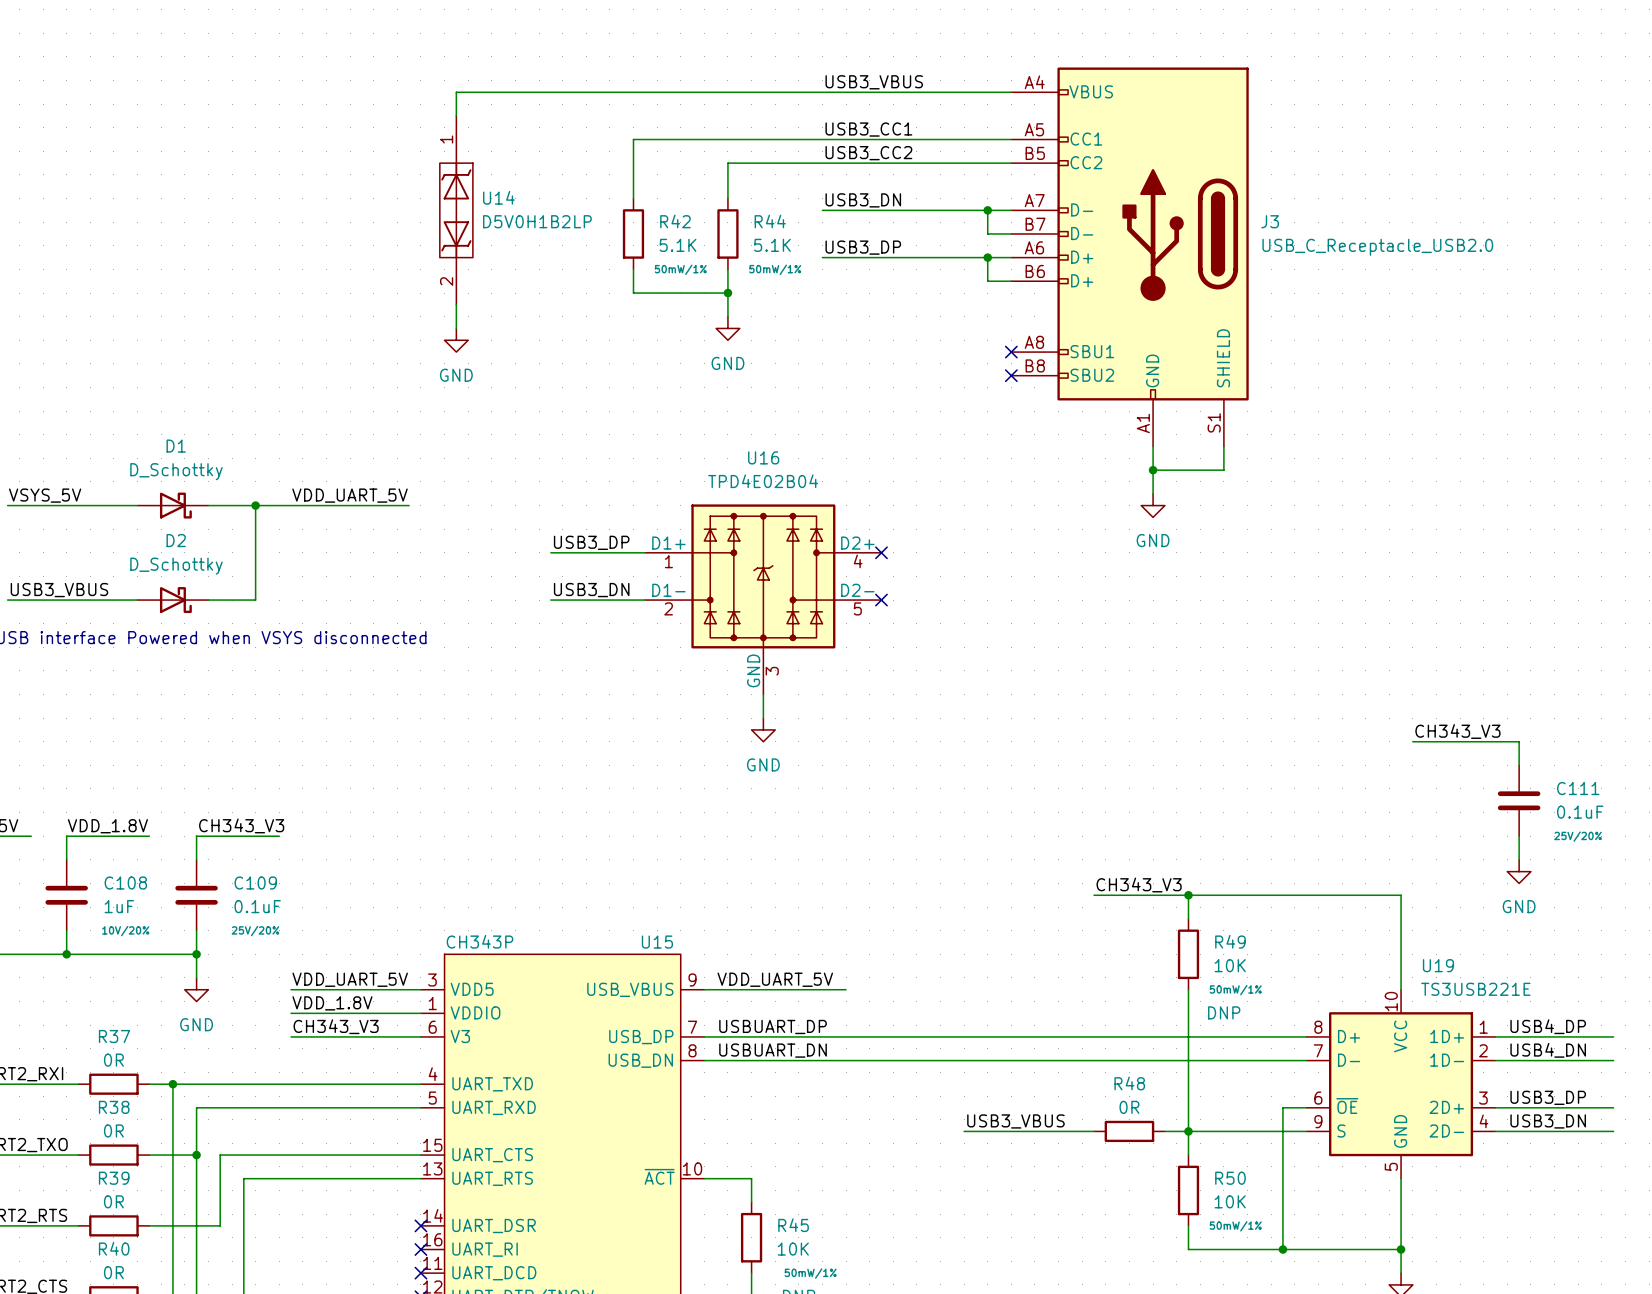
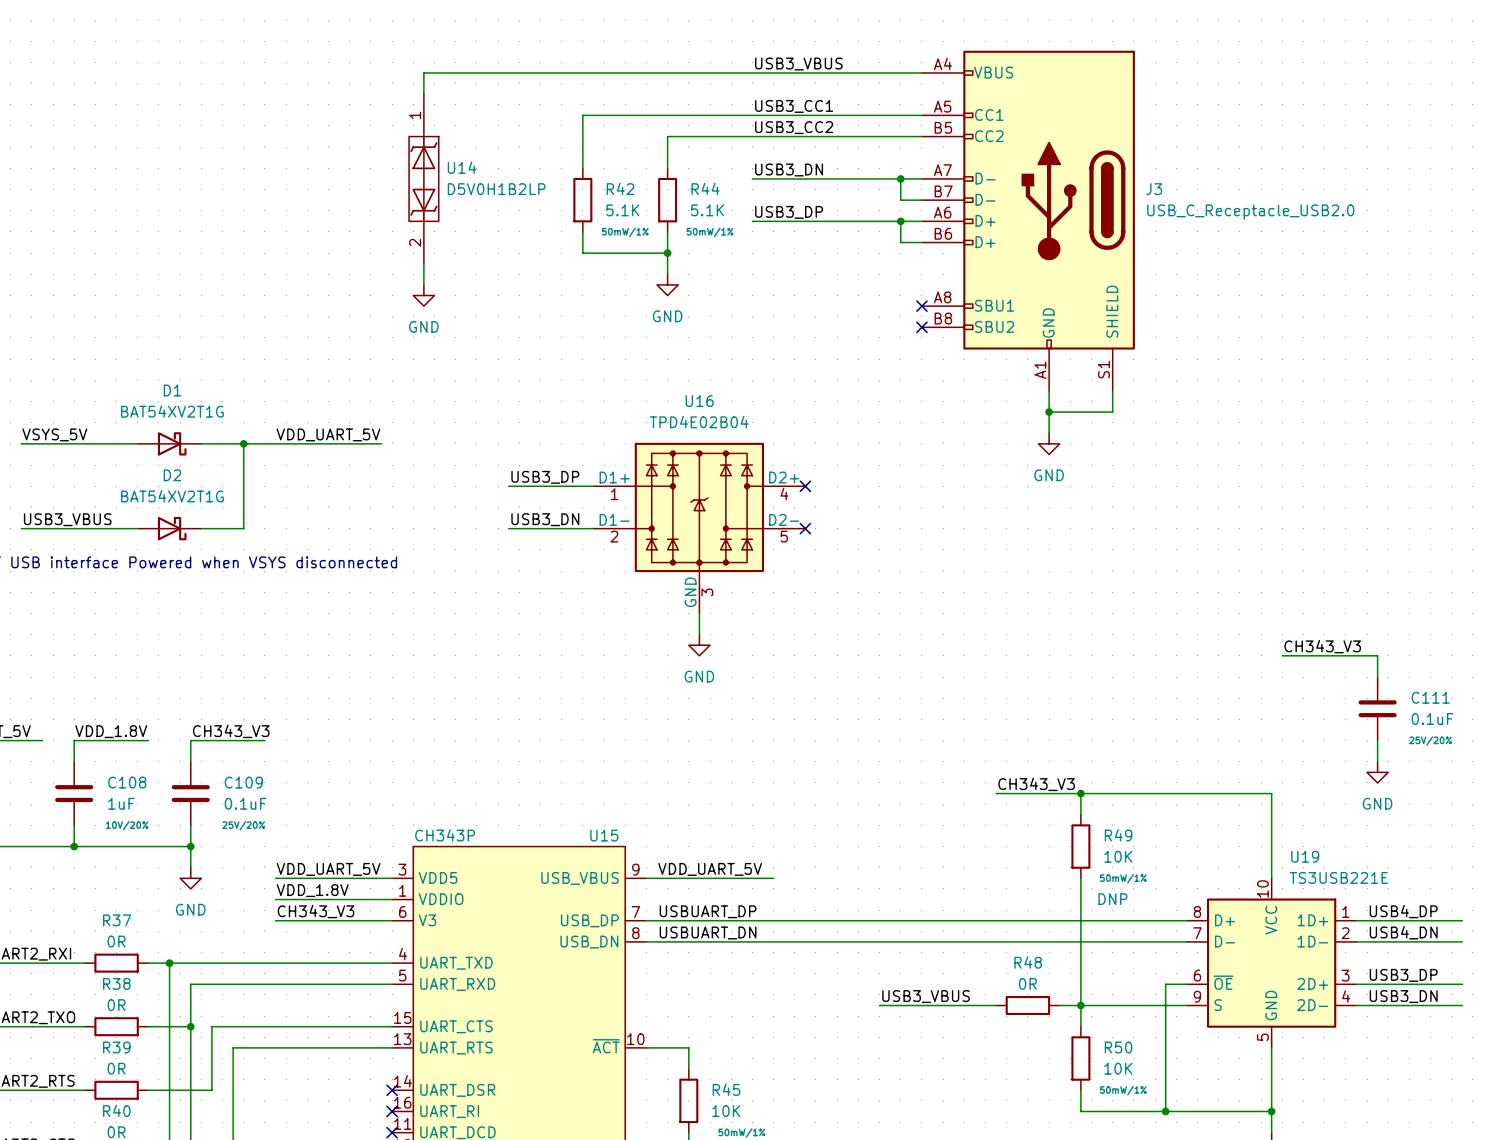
D1 value: D_Schottky (176, 471) -> BAT54XV2T1G (172, 411)
D2 value: D_Schottky (176, 566) -> BAT54XV2T1G (172, 496)

